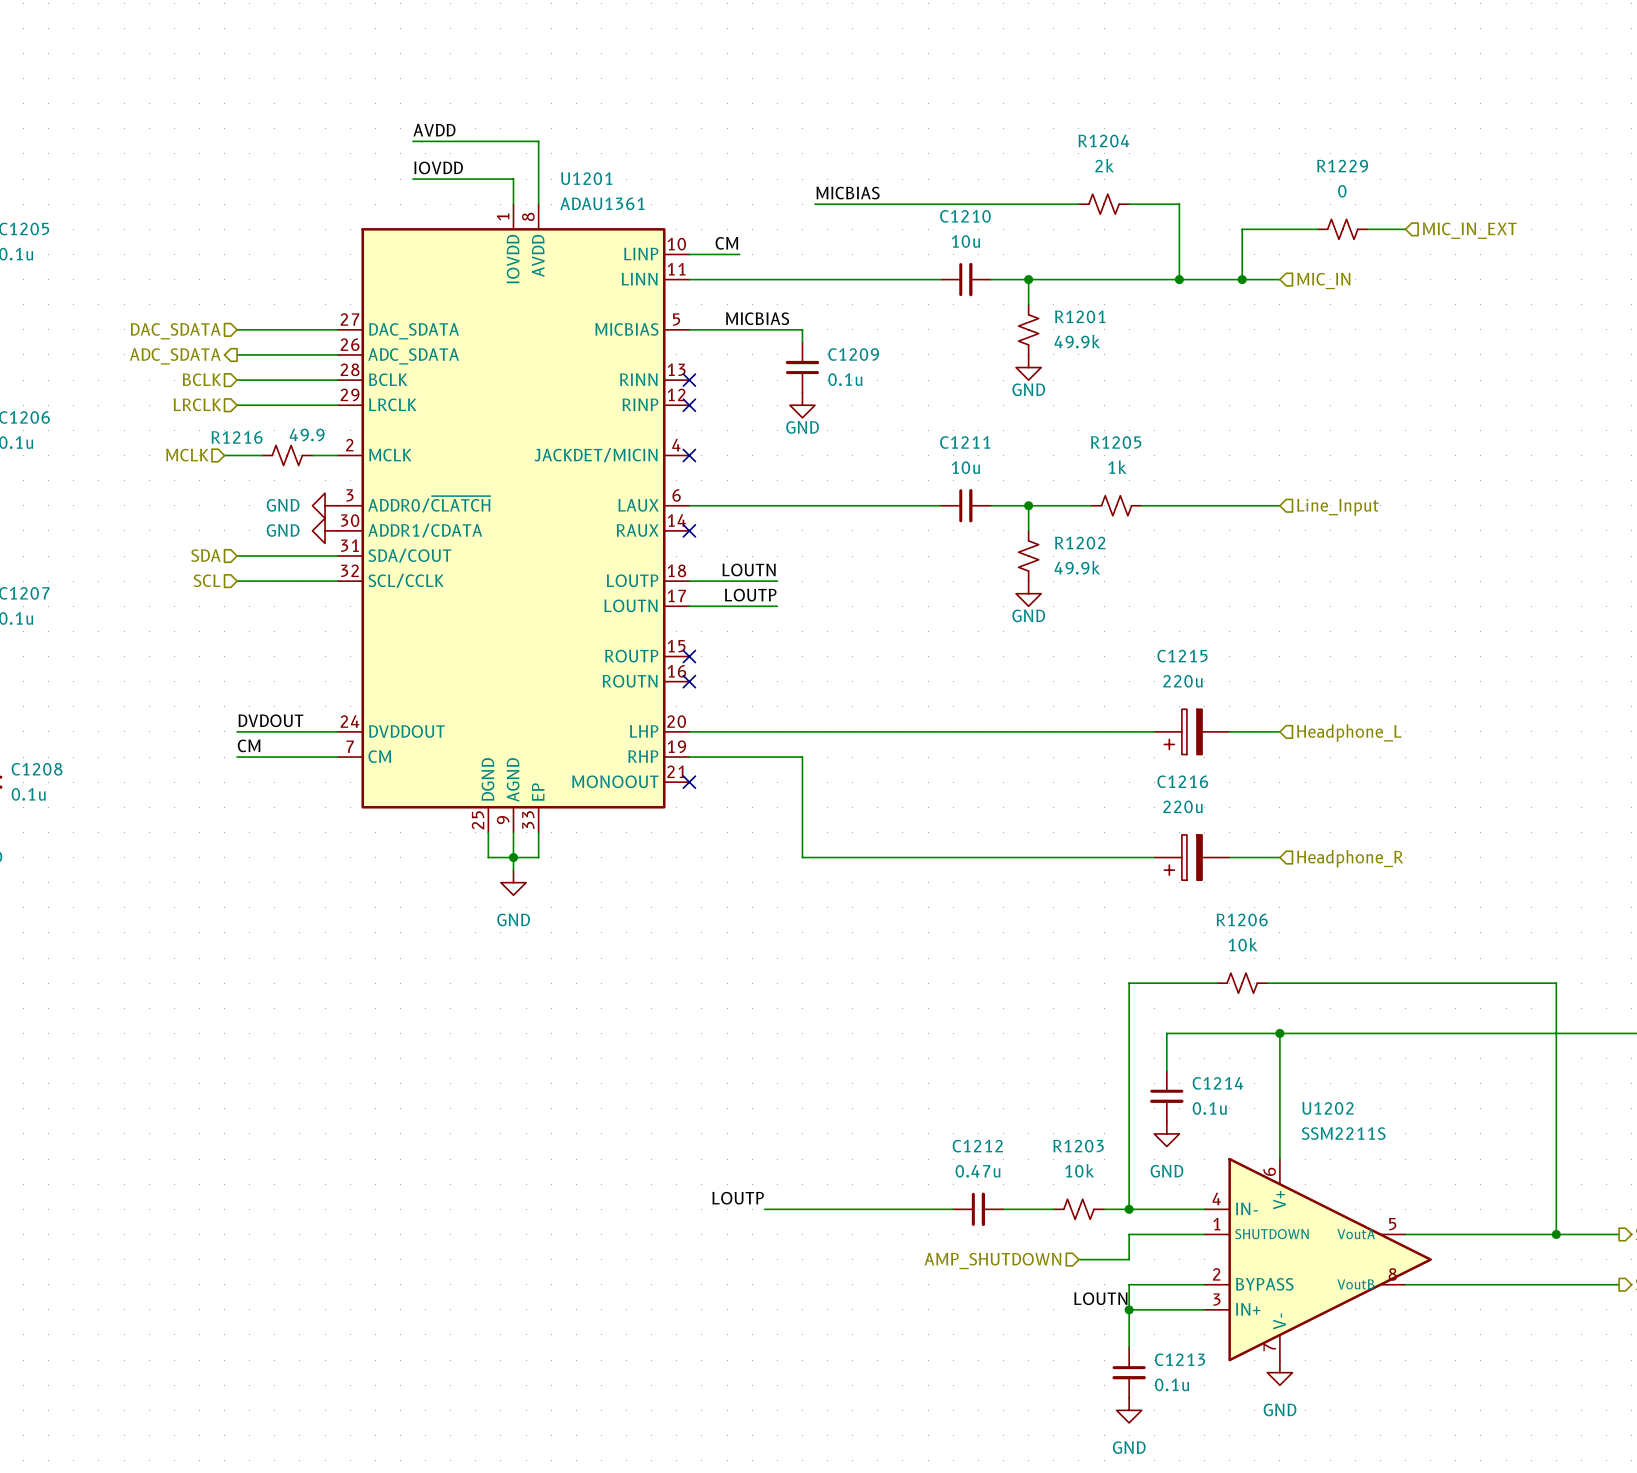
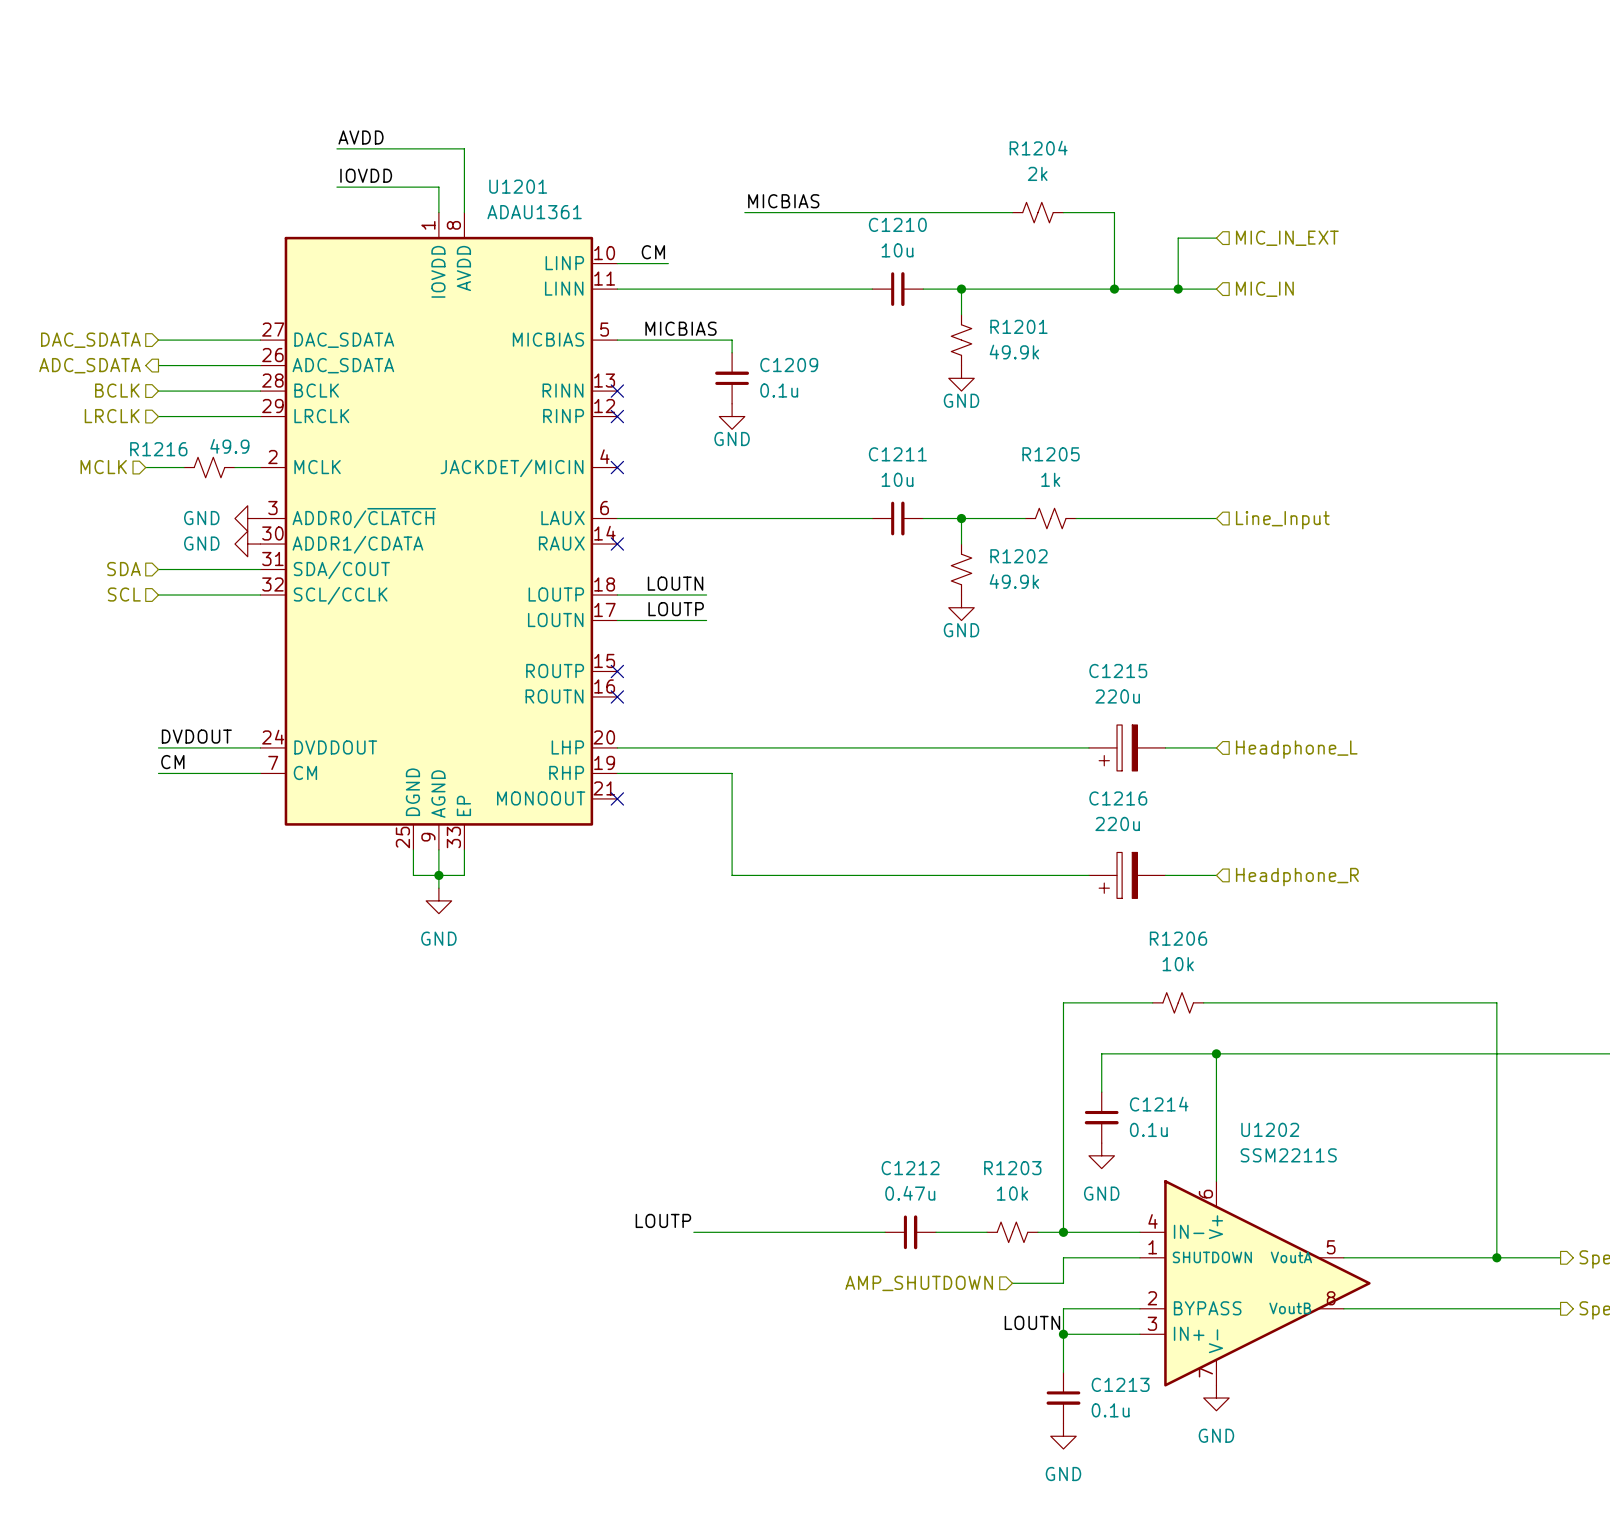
wire: (1279, 229) (1317, 229) -> none
R1229: 0 (1342, 229) -> none
wire: (1367, 229) (1405, 229) -> none
hierarchical label position: MIC_IN_EXT (1469, 230) -> MIC_IN_EXT (1287, 238)

